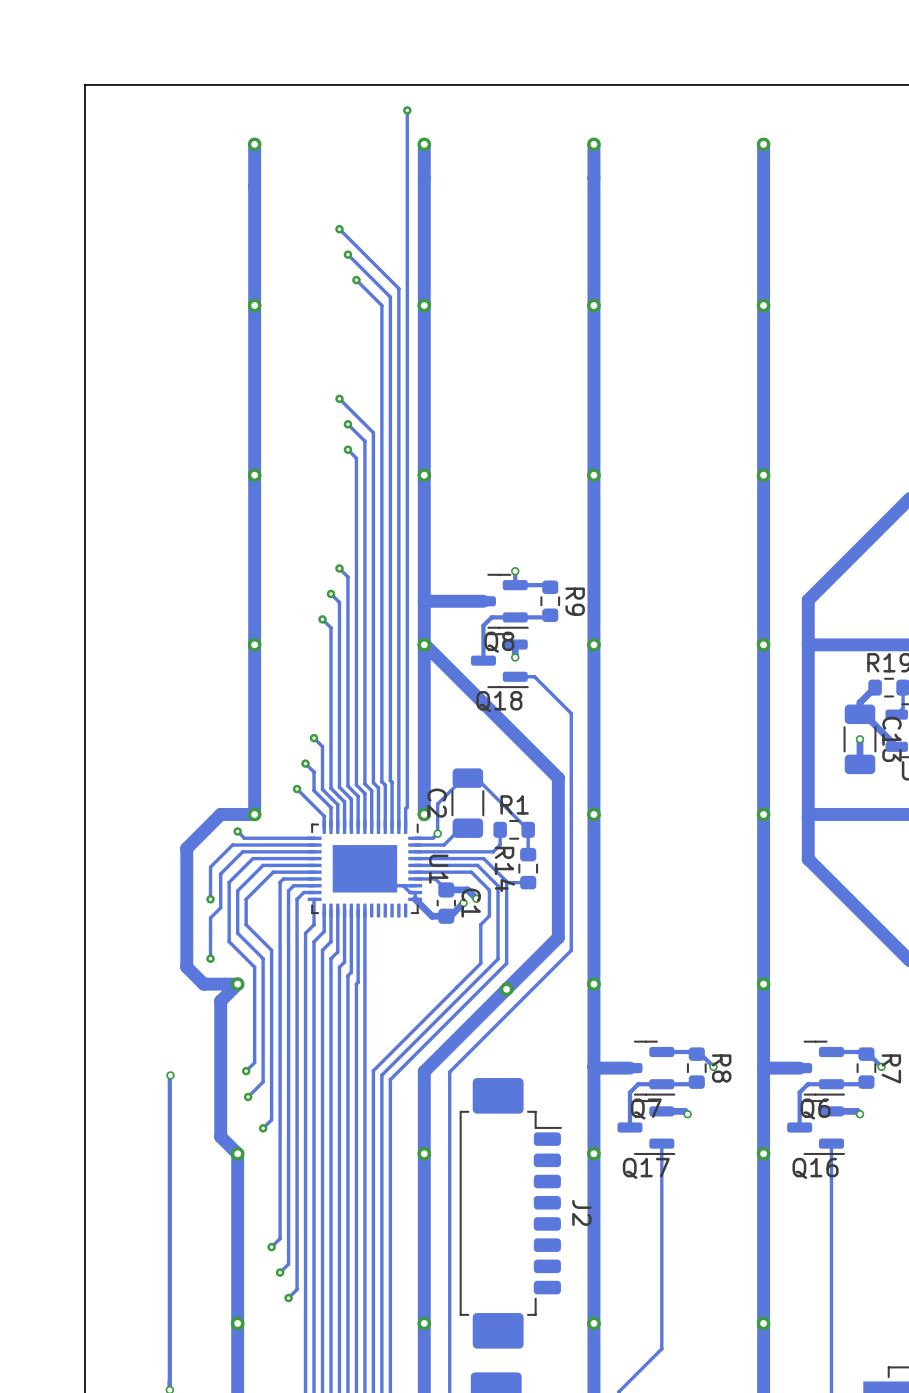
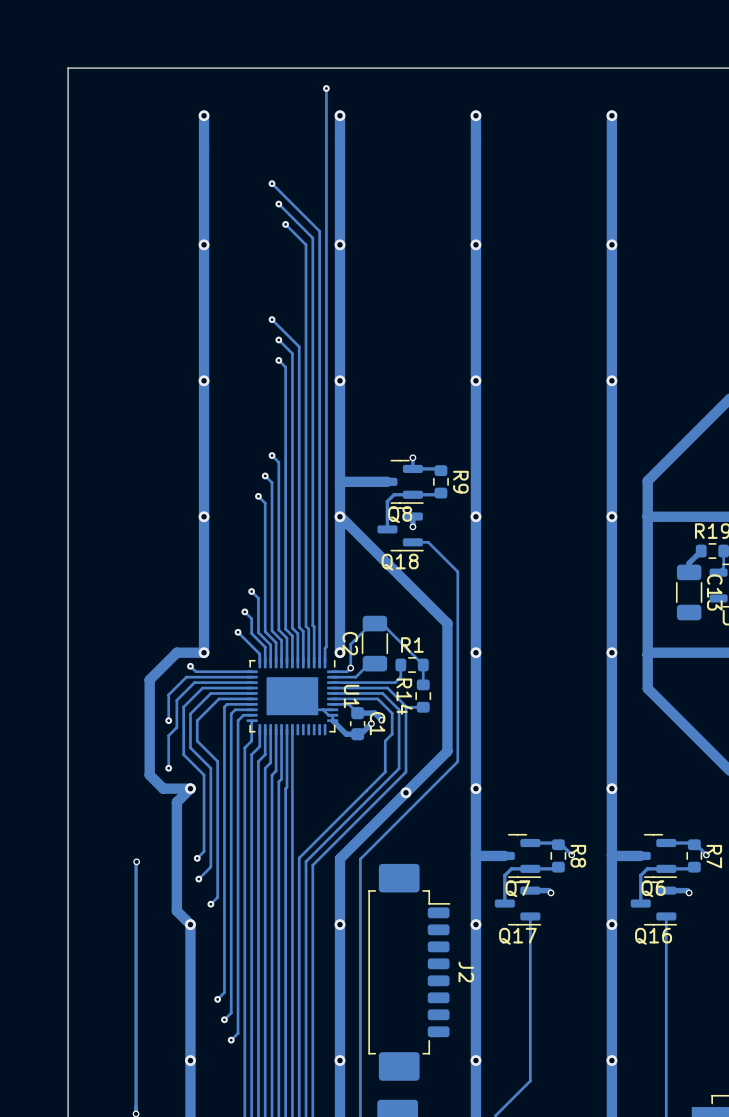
track: (859, 714) (864, 714) (896, 746) -> none
track: (859, 739) (859, 764) -> none
via: (859, 739) -> none

